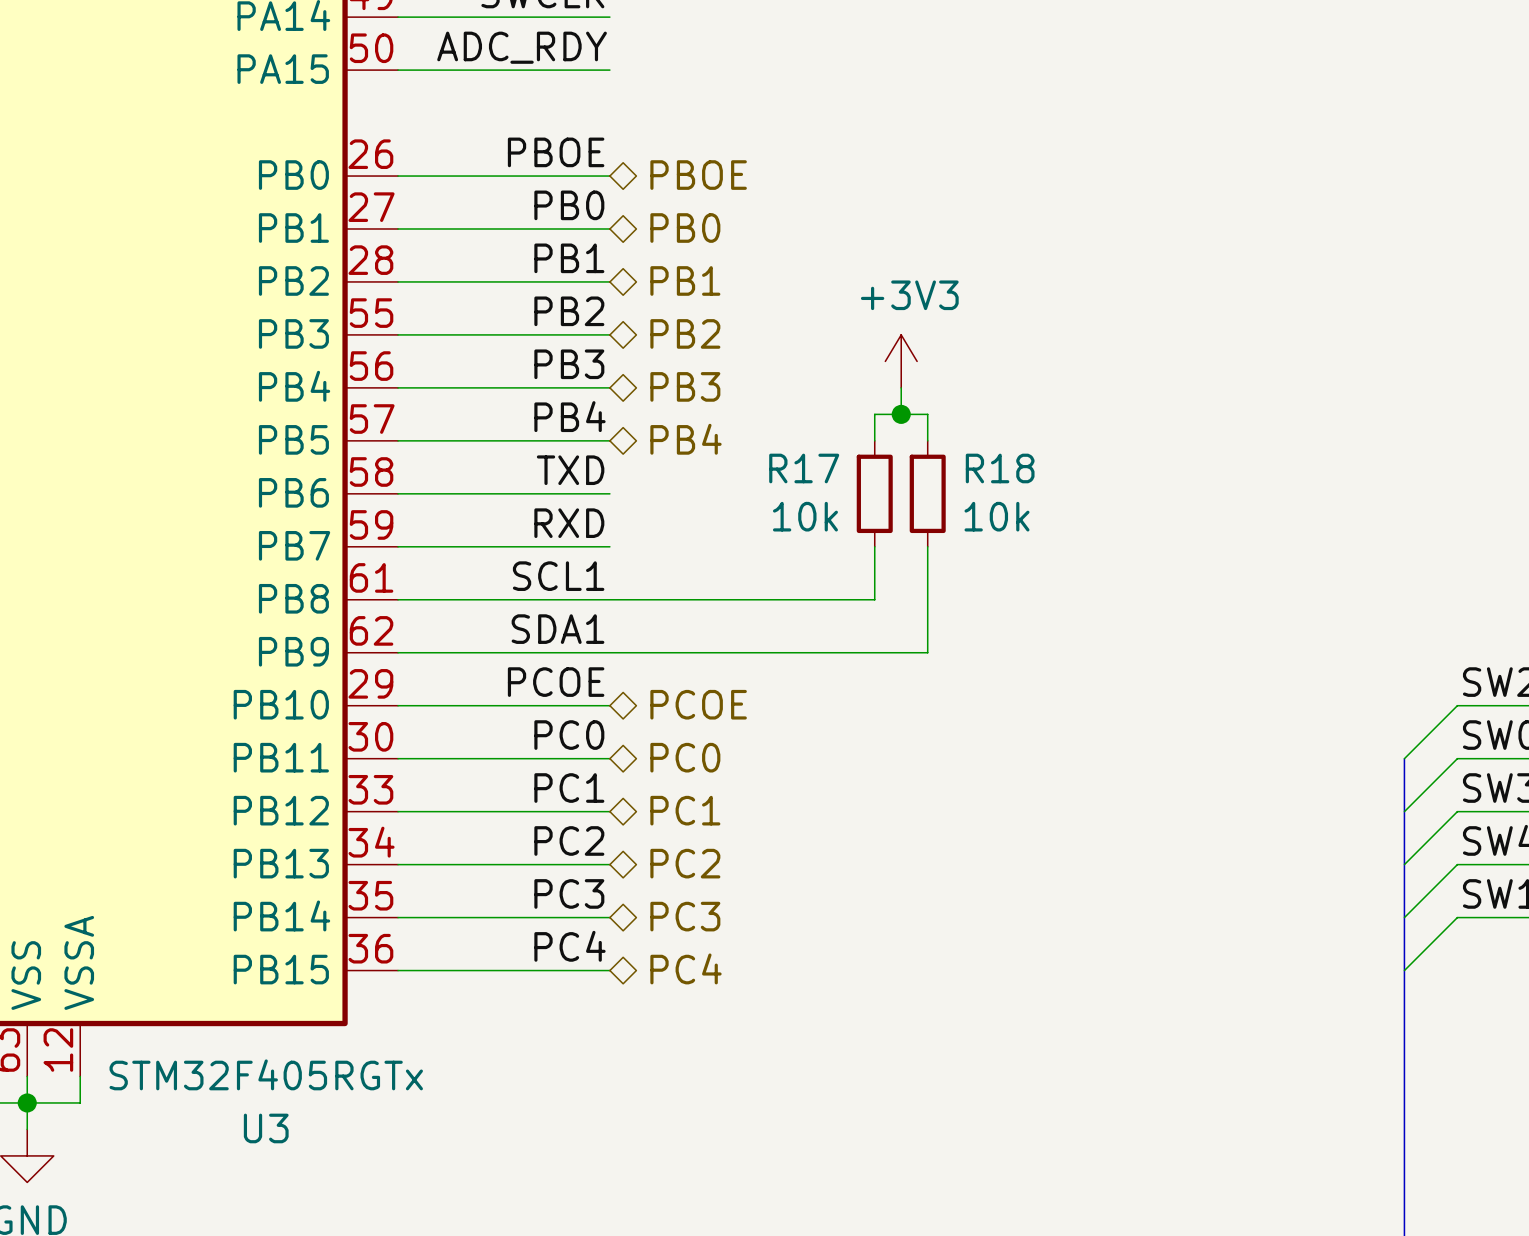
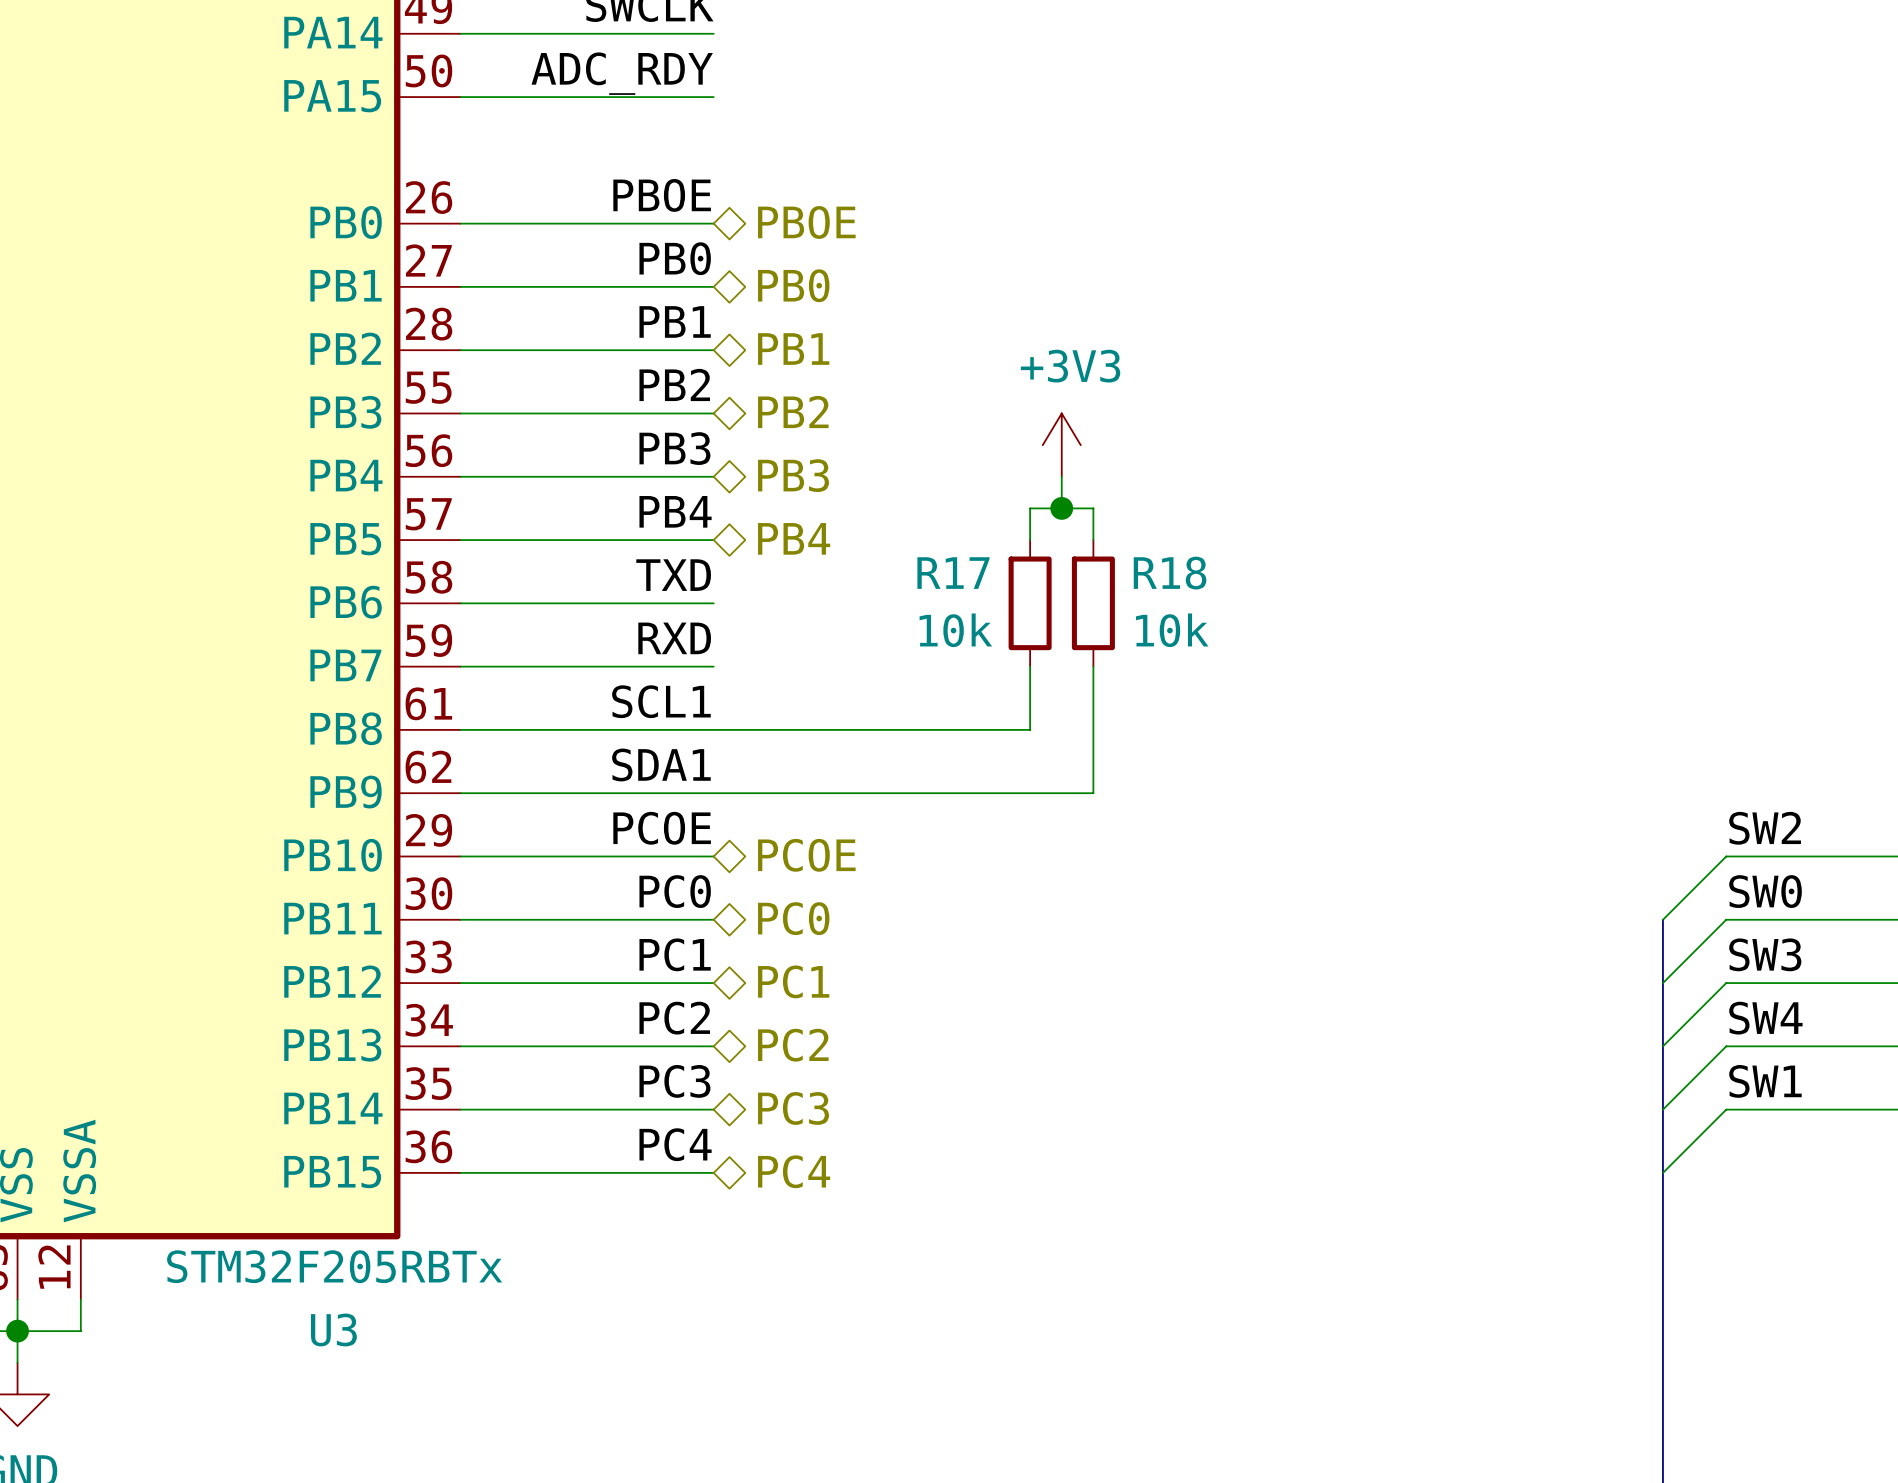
U3 value: STM32F405RGTx (266, 1074) -> STM32F205RBTx (334, 1266)
U3 name position: U3 (266, 1128) -> U3 (333, 1329)

